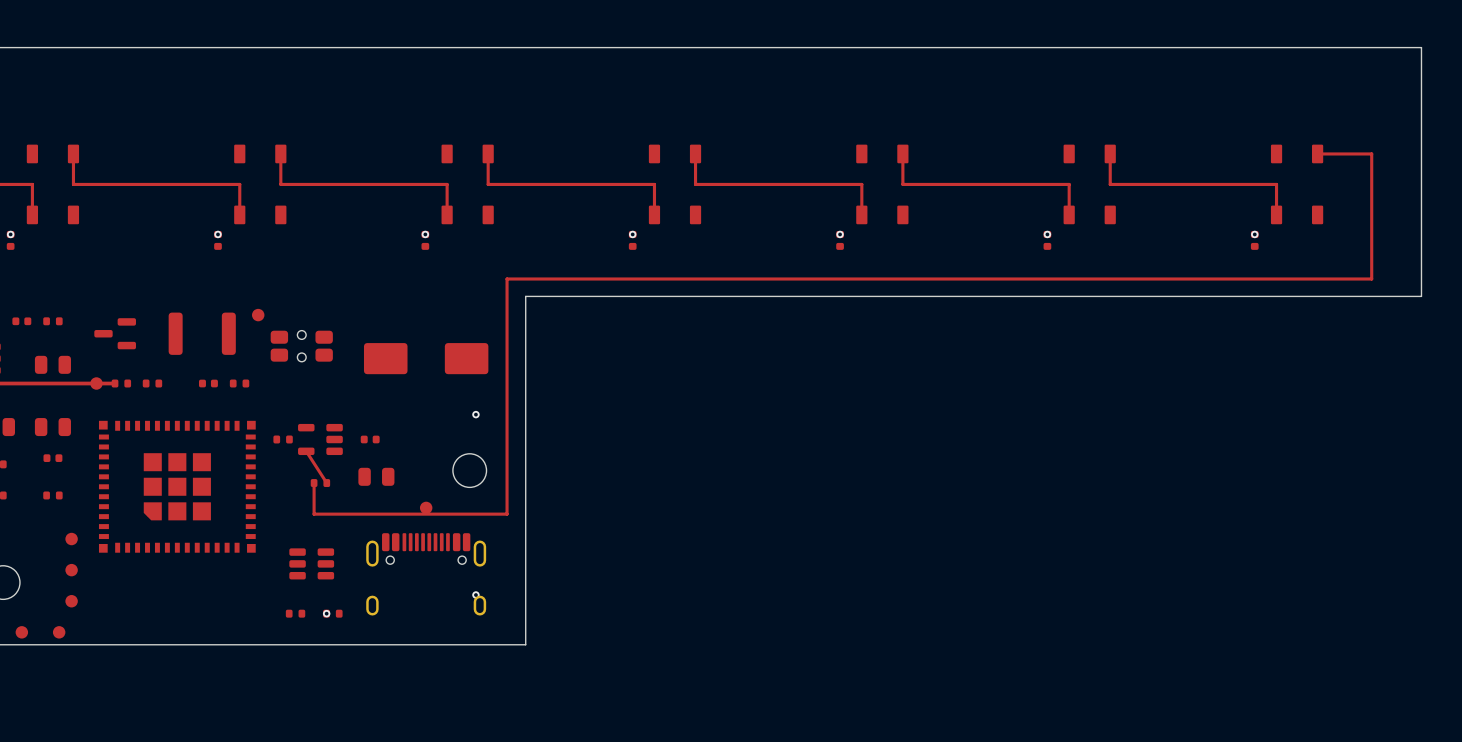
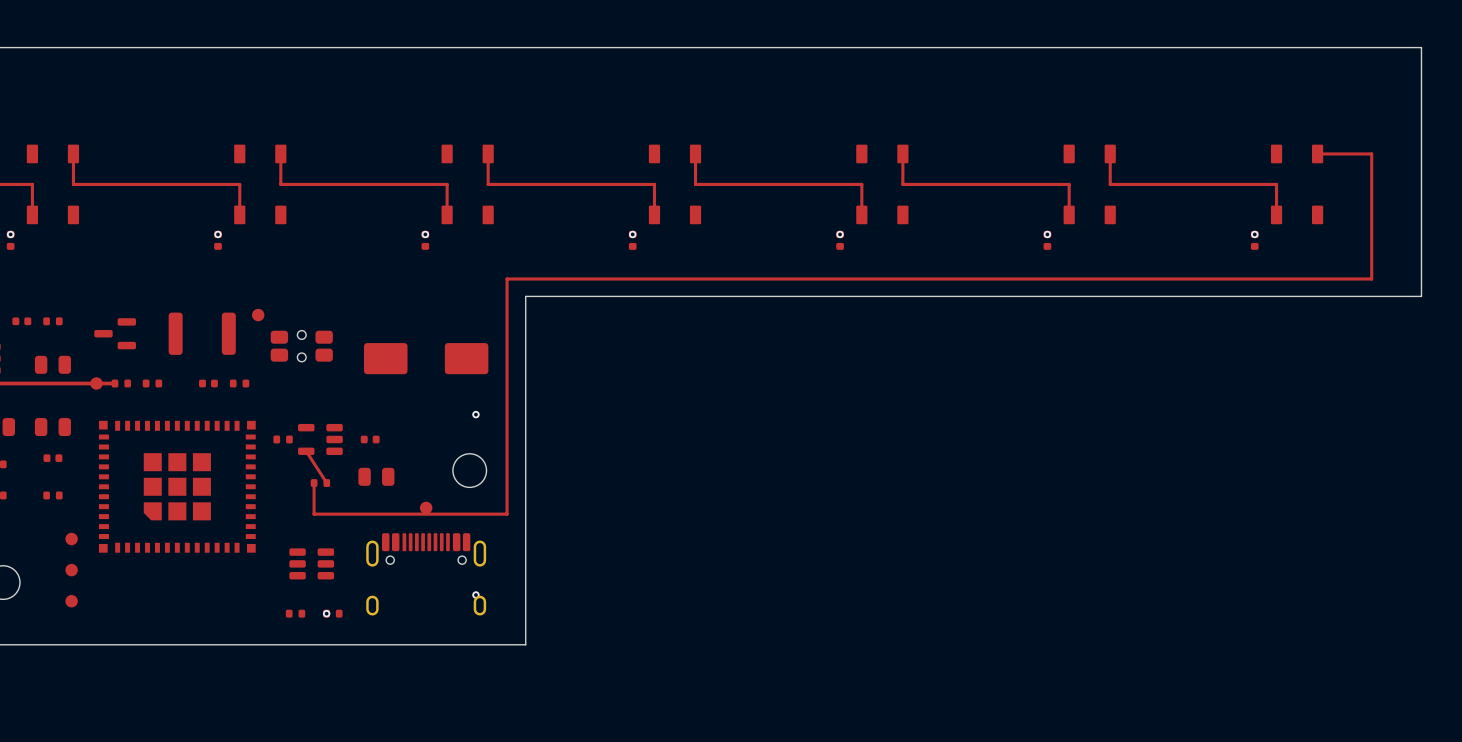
part: (21, 632) -> none
part: (59, 632) -> none

